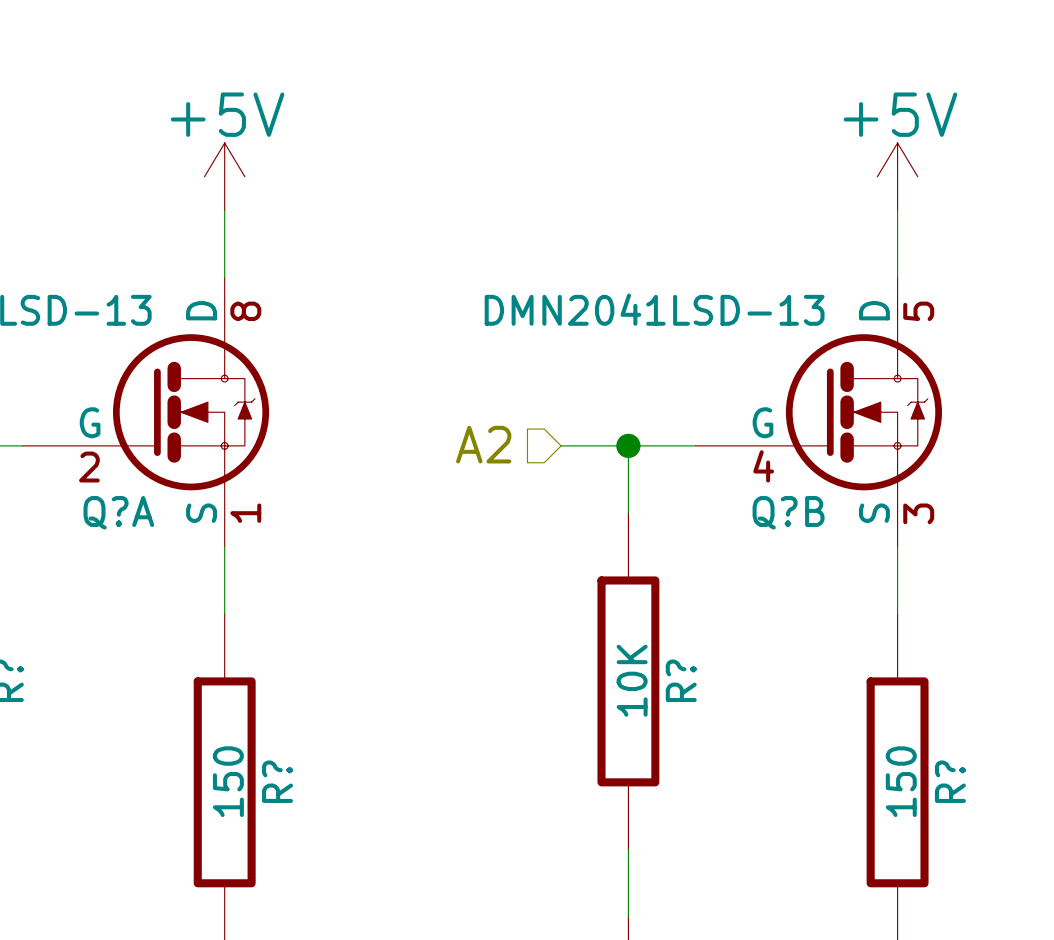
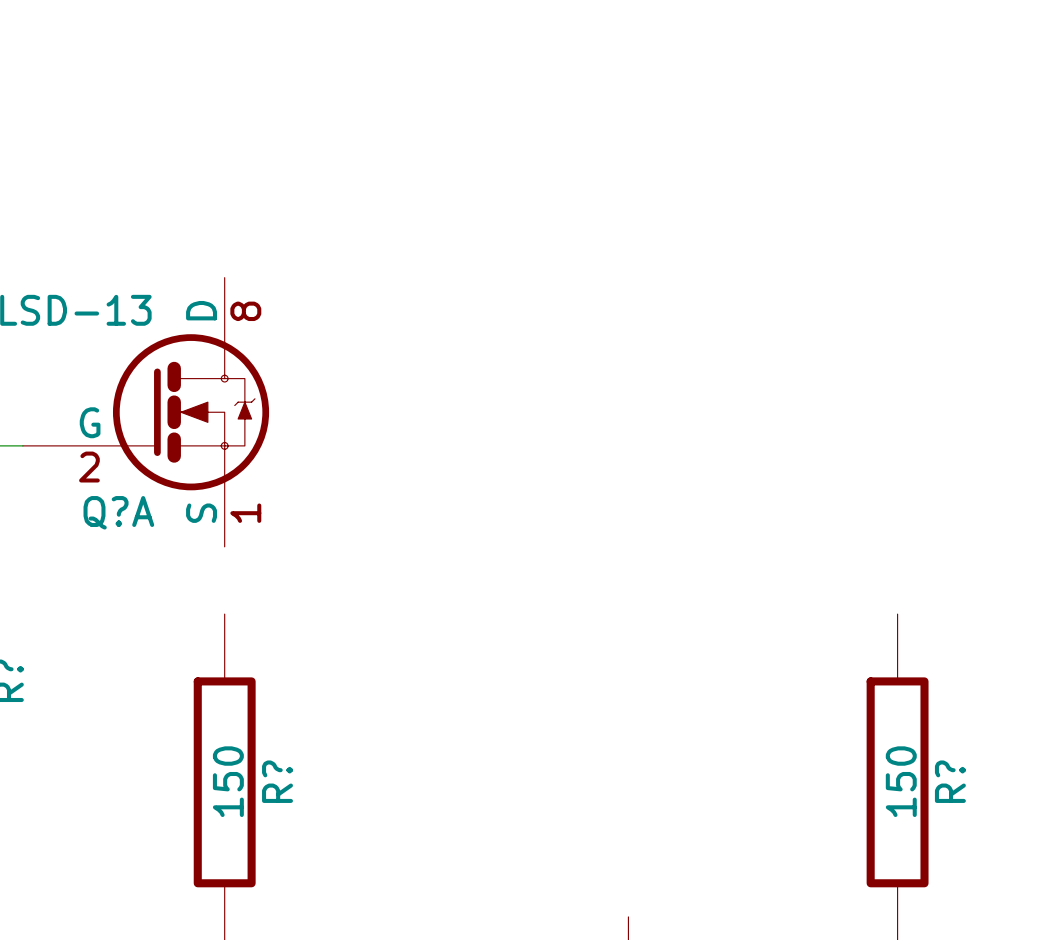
power symbol: +5V (224, 176) -> none
power symbol: +5V (897, 176) -> none
wire: (224, 210) (224, 277) -> none
wire: (897, 210) (897, 277) -> none
Q?B: DMN2041LSD-13 (818, 412) -> none
hierarchical label: A2 (483, 444) -> none
wire: (561, 445) (695, 445) -> none
wire: (628, 445) (628, 513) -> none
junction: (628, 445) -> none
wire: (224, 546) (224, 614) -> none
wire: (897, 546) (897, 614) -> none
R?: 10K (628, 681) -> none
wire: (628, 849) (628, 916) -> none

